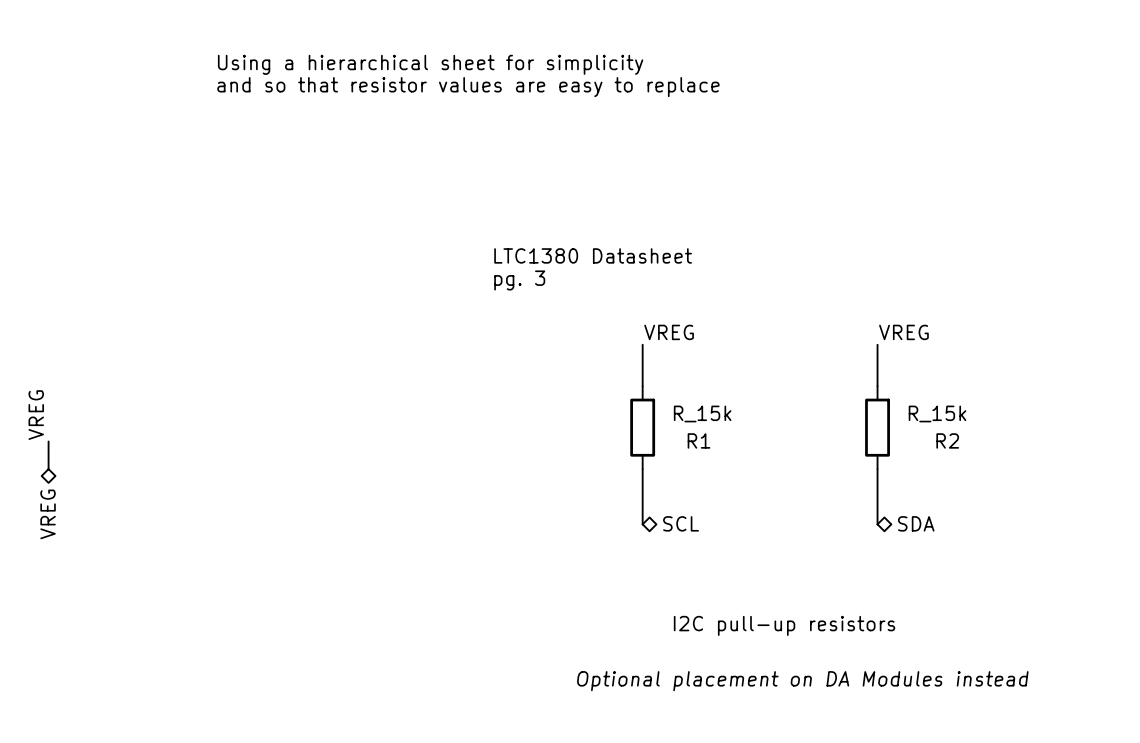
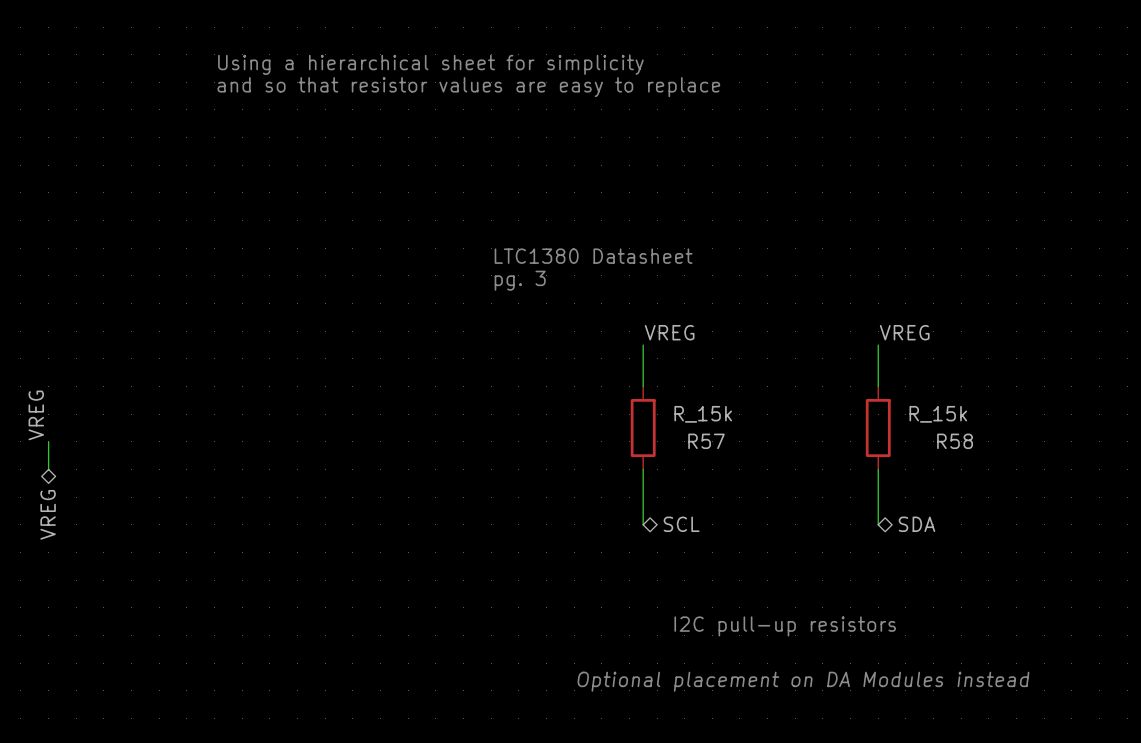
R1 name: R1 (699, 440) -> R57 (706, 441)
R2 name: R2 (947, 440) -> R58 (955, 441)

